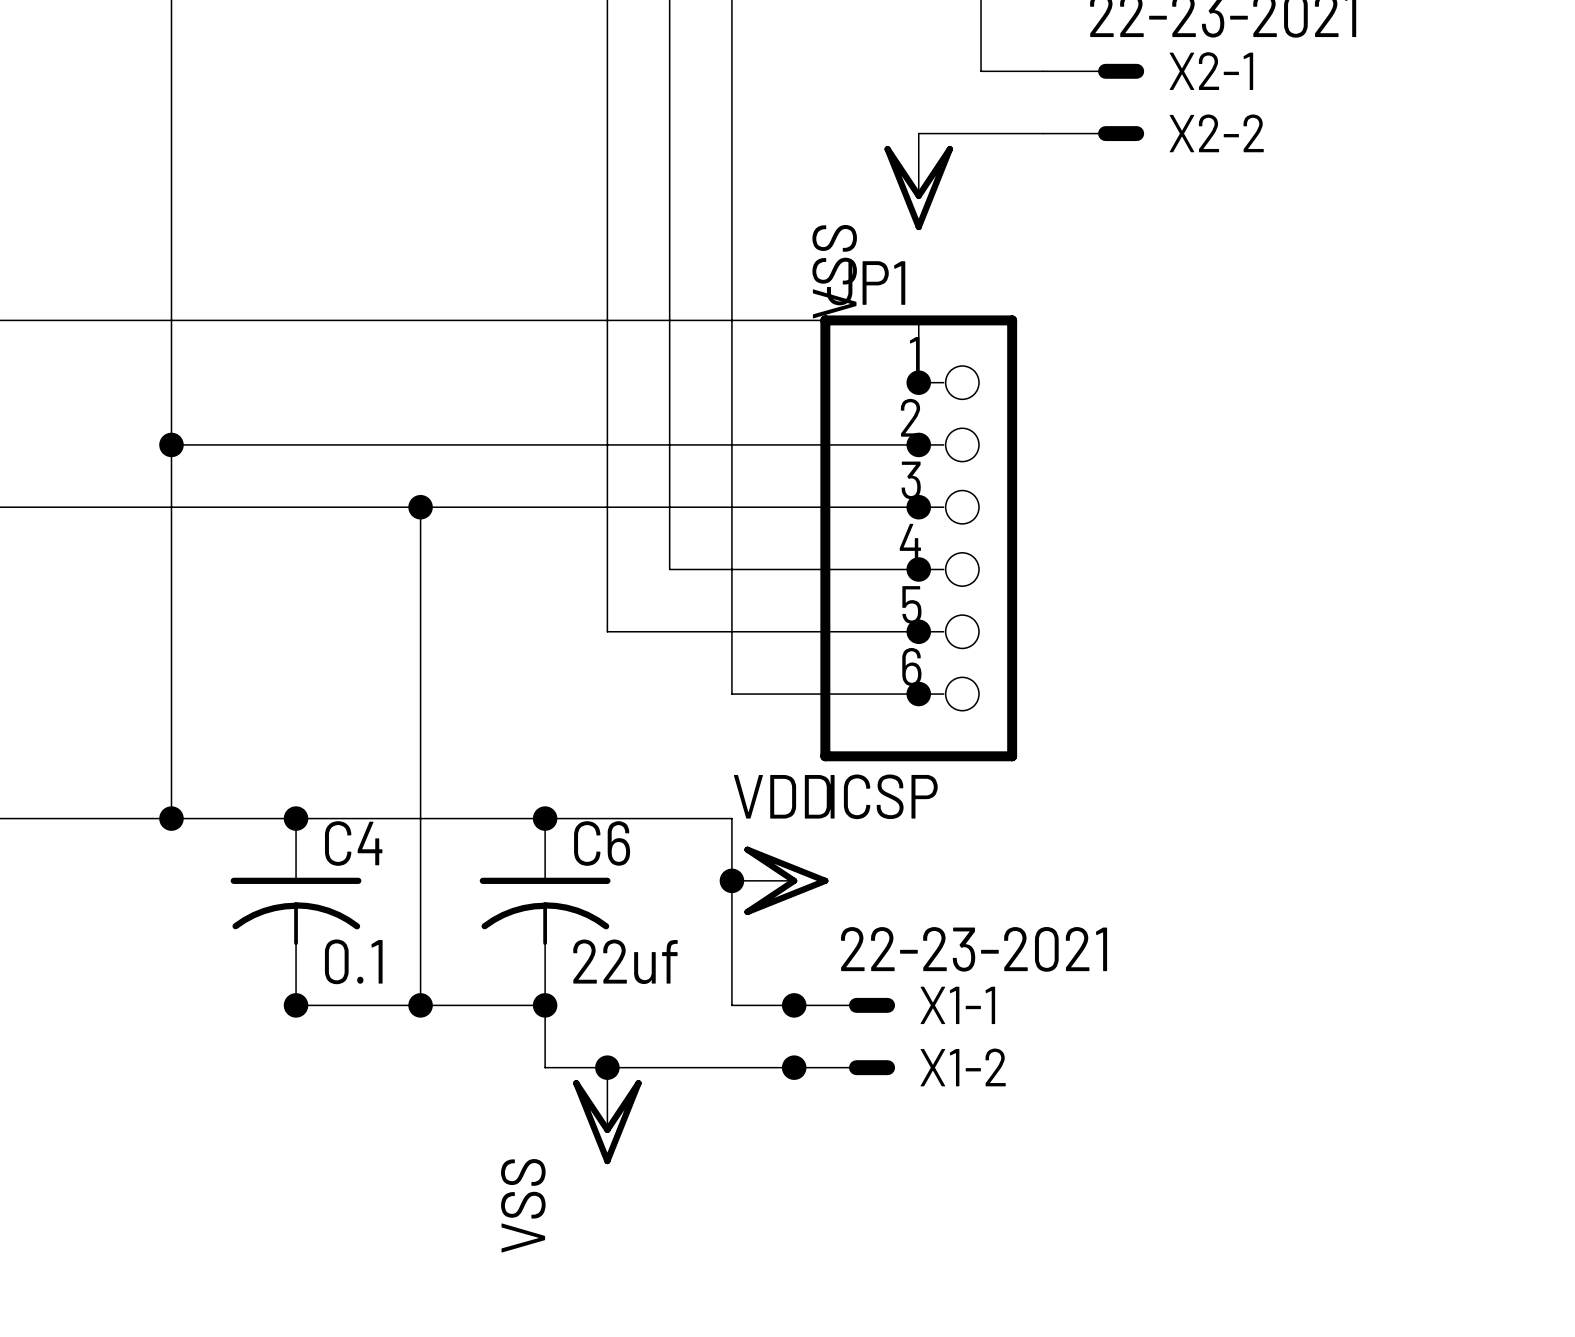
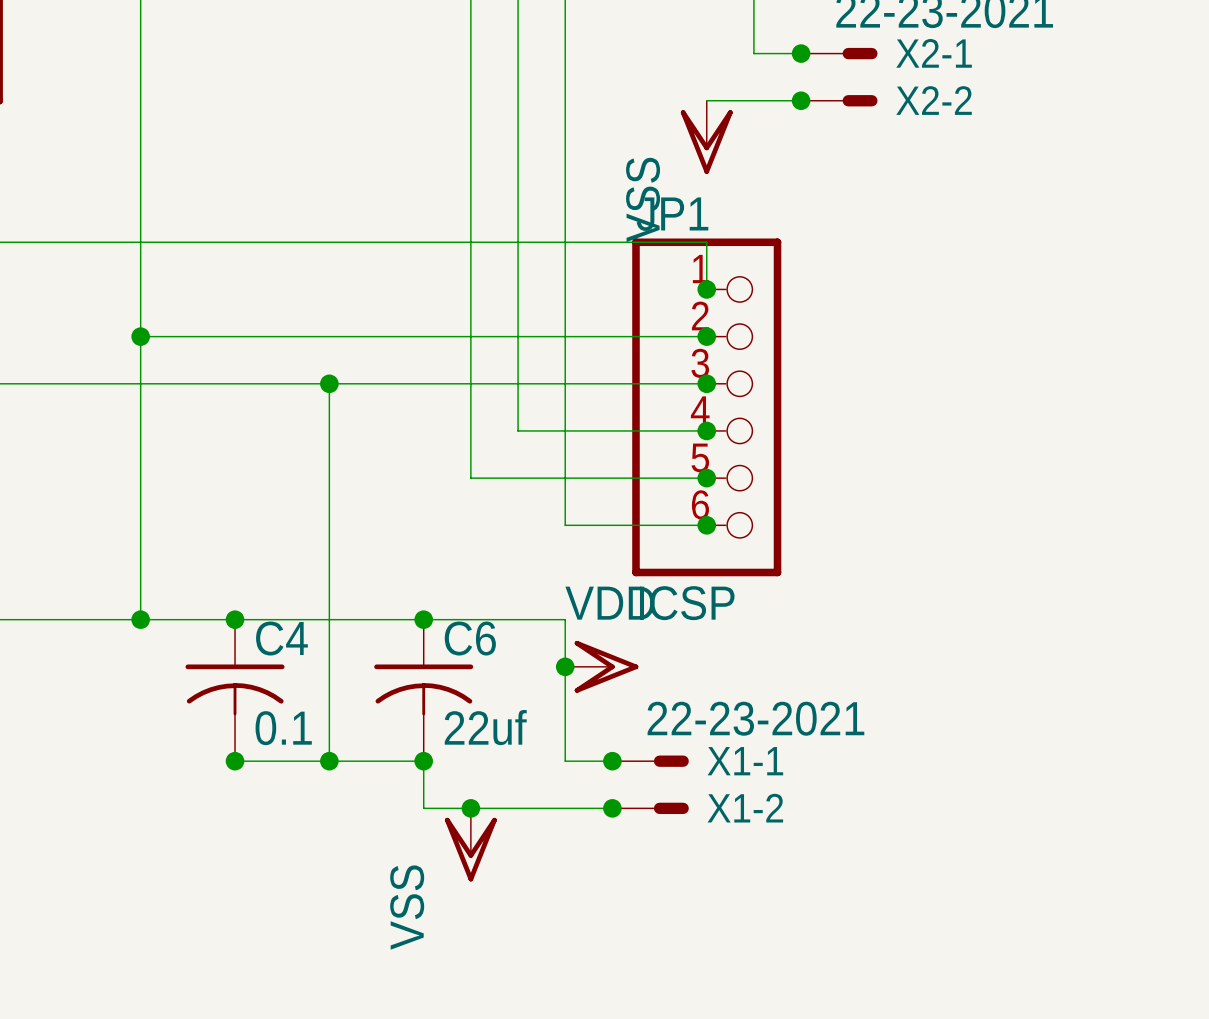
junction: none -> (801, 53)
junction: none -> (801, 100)

